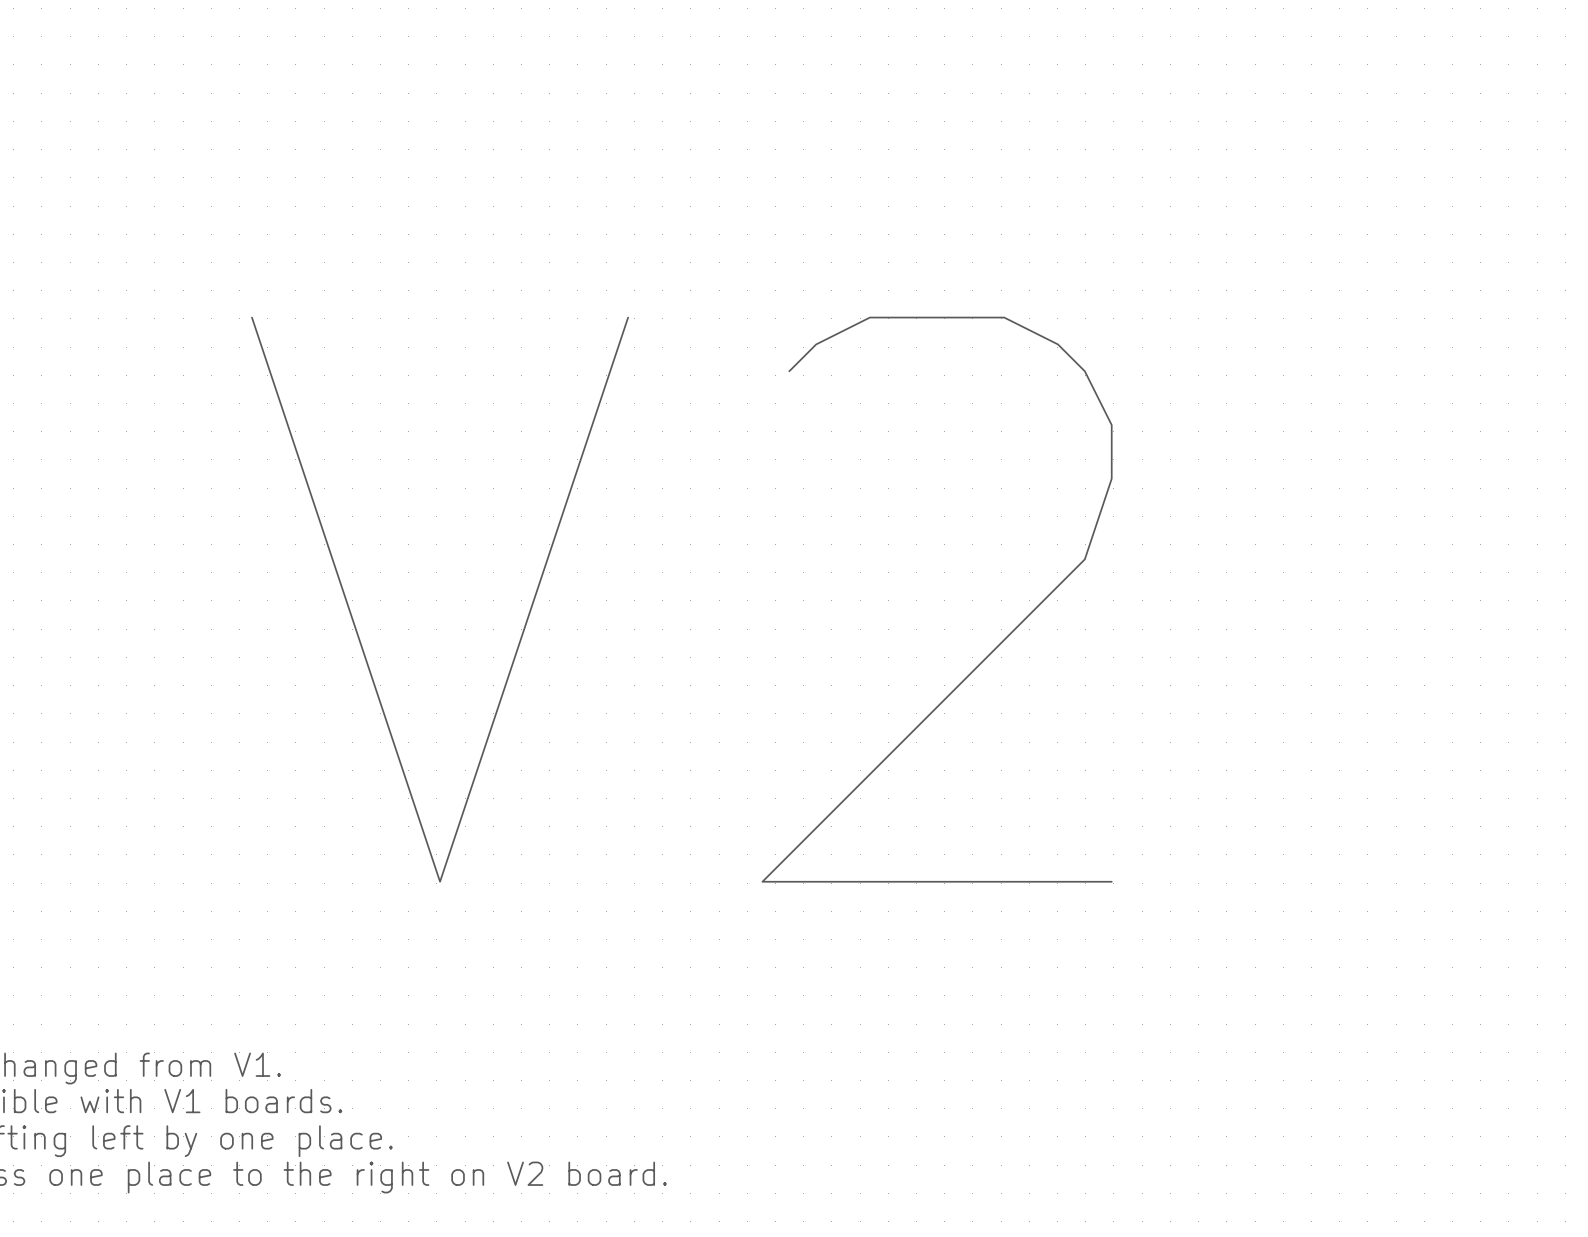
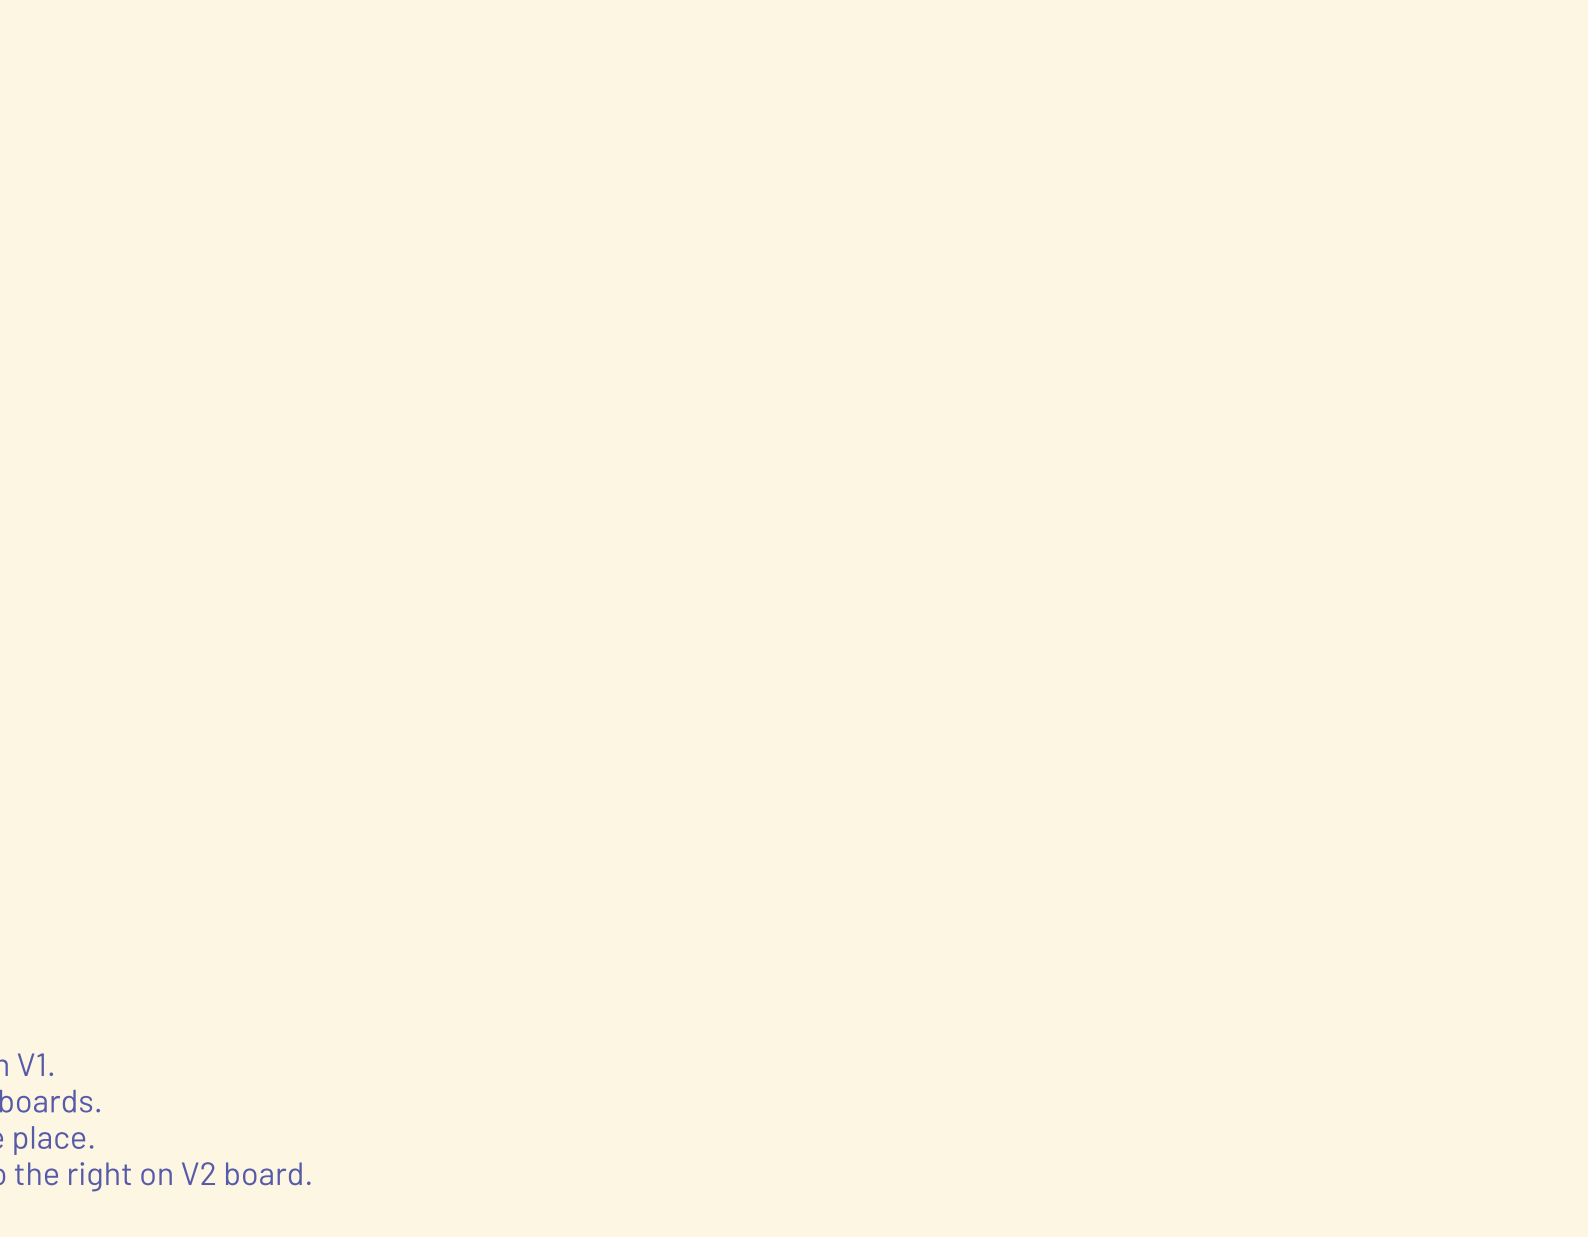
text: V2 (681, 599) -> none

